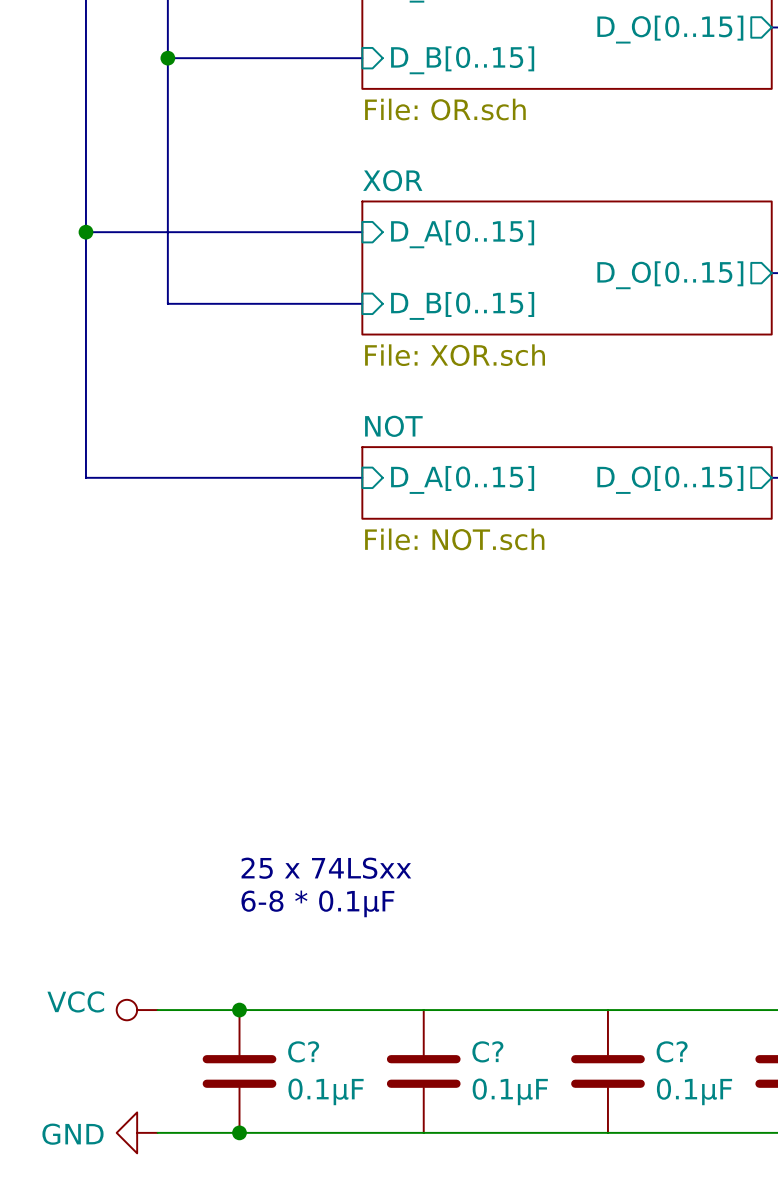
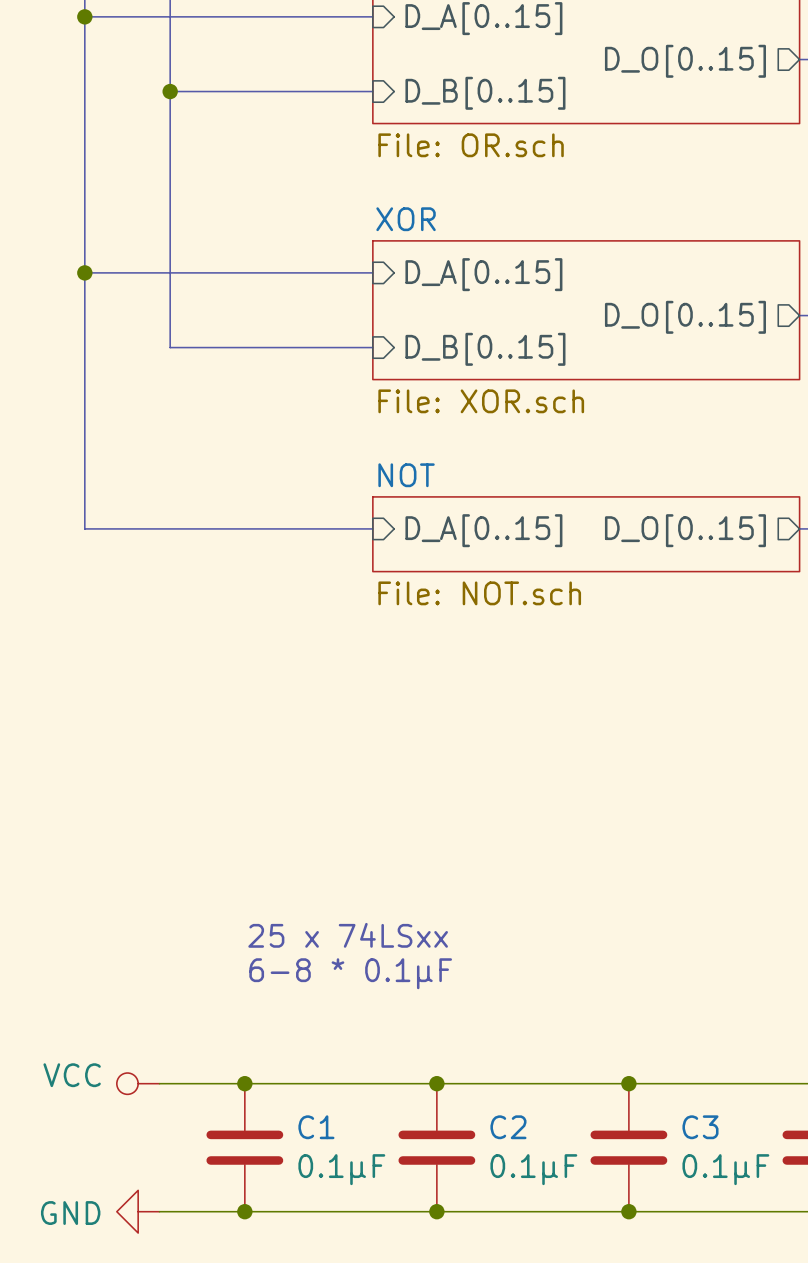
junction: none -> (436, 1083)
junction: none -> (628, 1083)
C? name: C? (303, 1051) -> C1 (316, 1127)
C? name: C? (487, 1051) -> C2 (508, 1127)
C? name: C? (672, 1051) -> C3 (700, 1127)
junction: none -> (436, 1211)
junction: none -> (628, 1211)

